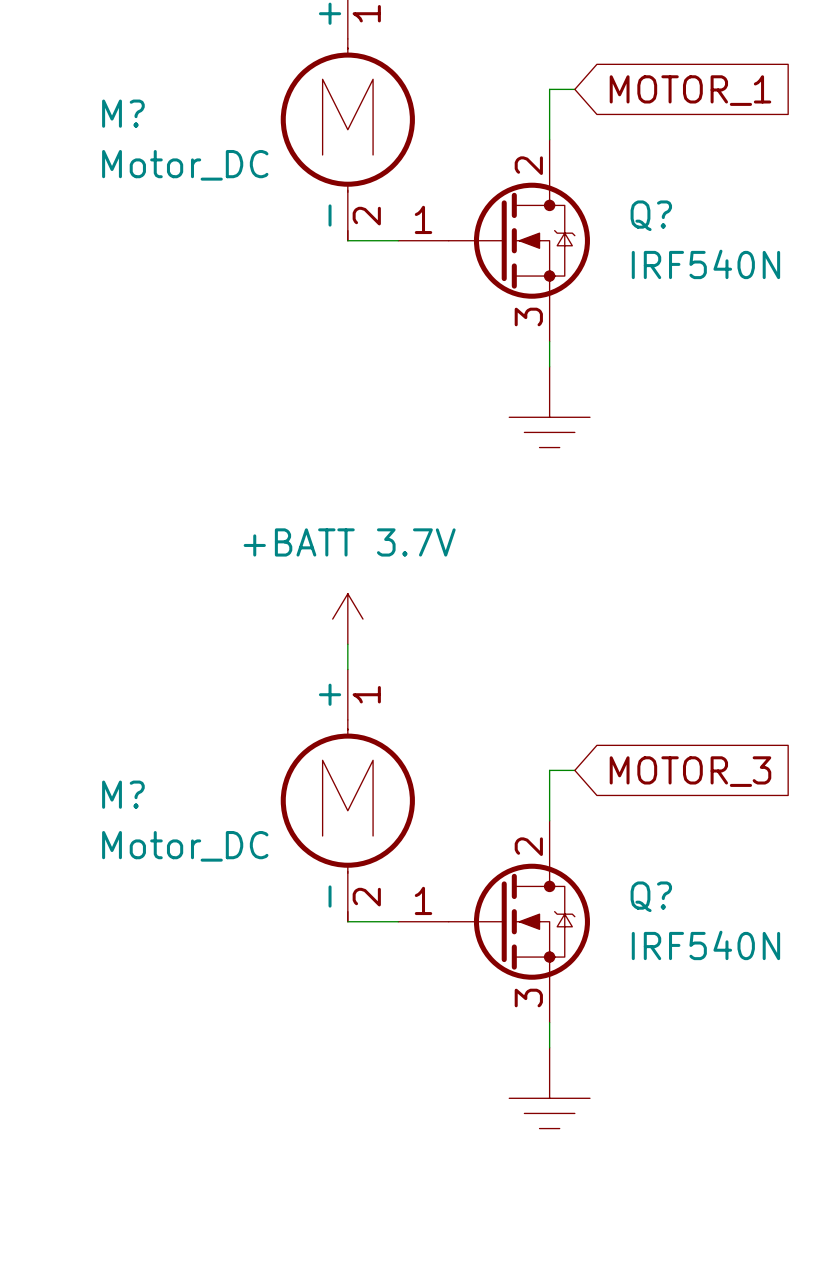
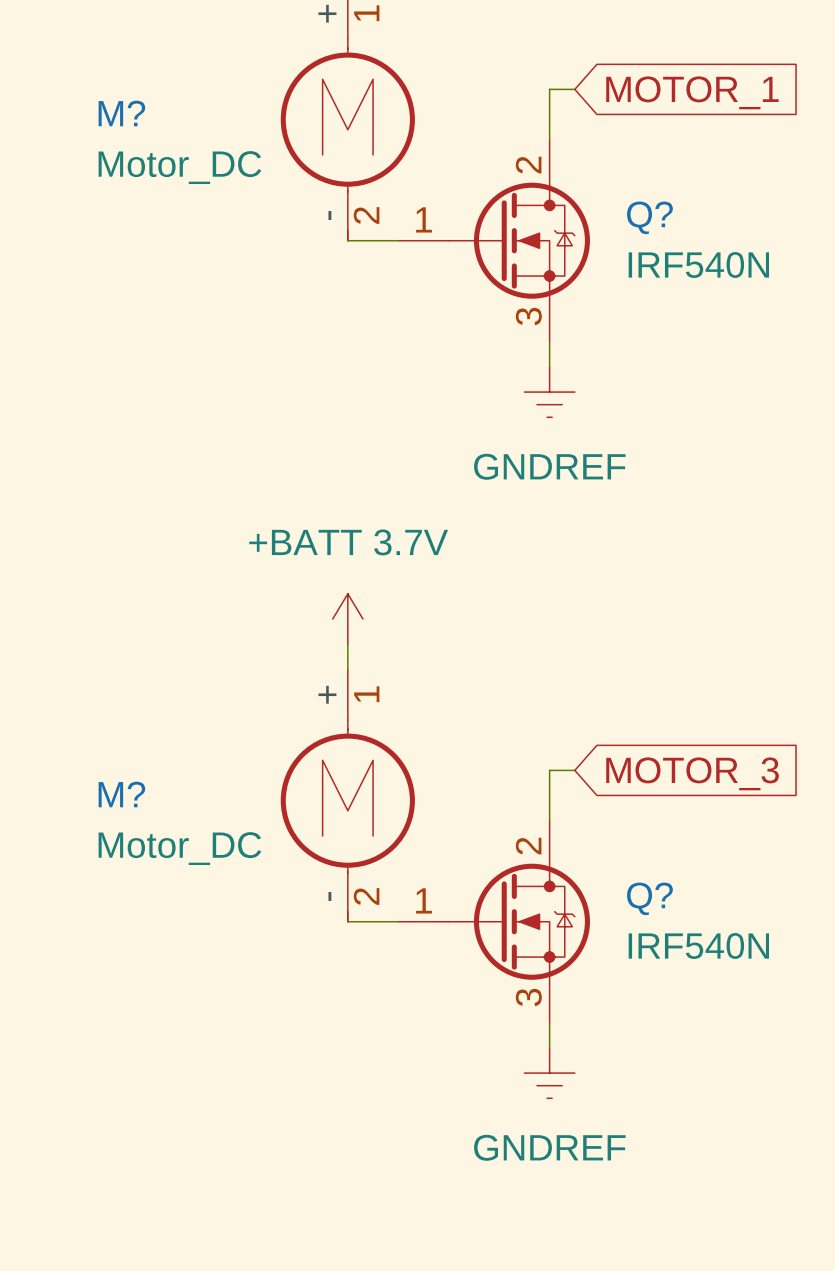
power symbol shape: [509, 366, 590, 448] -> [524, 366, 575, 418]
power symbol text: none -> GNDREF (549, 466)
power symbol shape: [509, 1047, 590, 1129] -> [524, 1047, 575, 1099]
power symbol text: none -> GNDREF (549, 1147)

